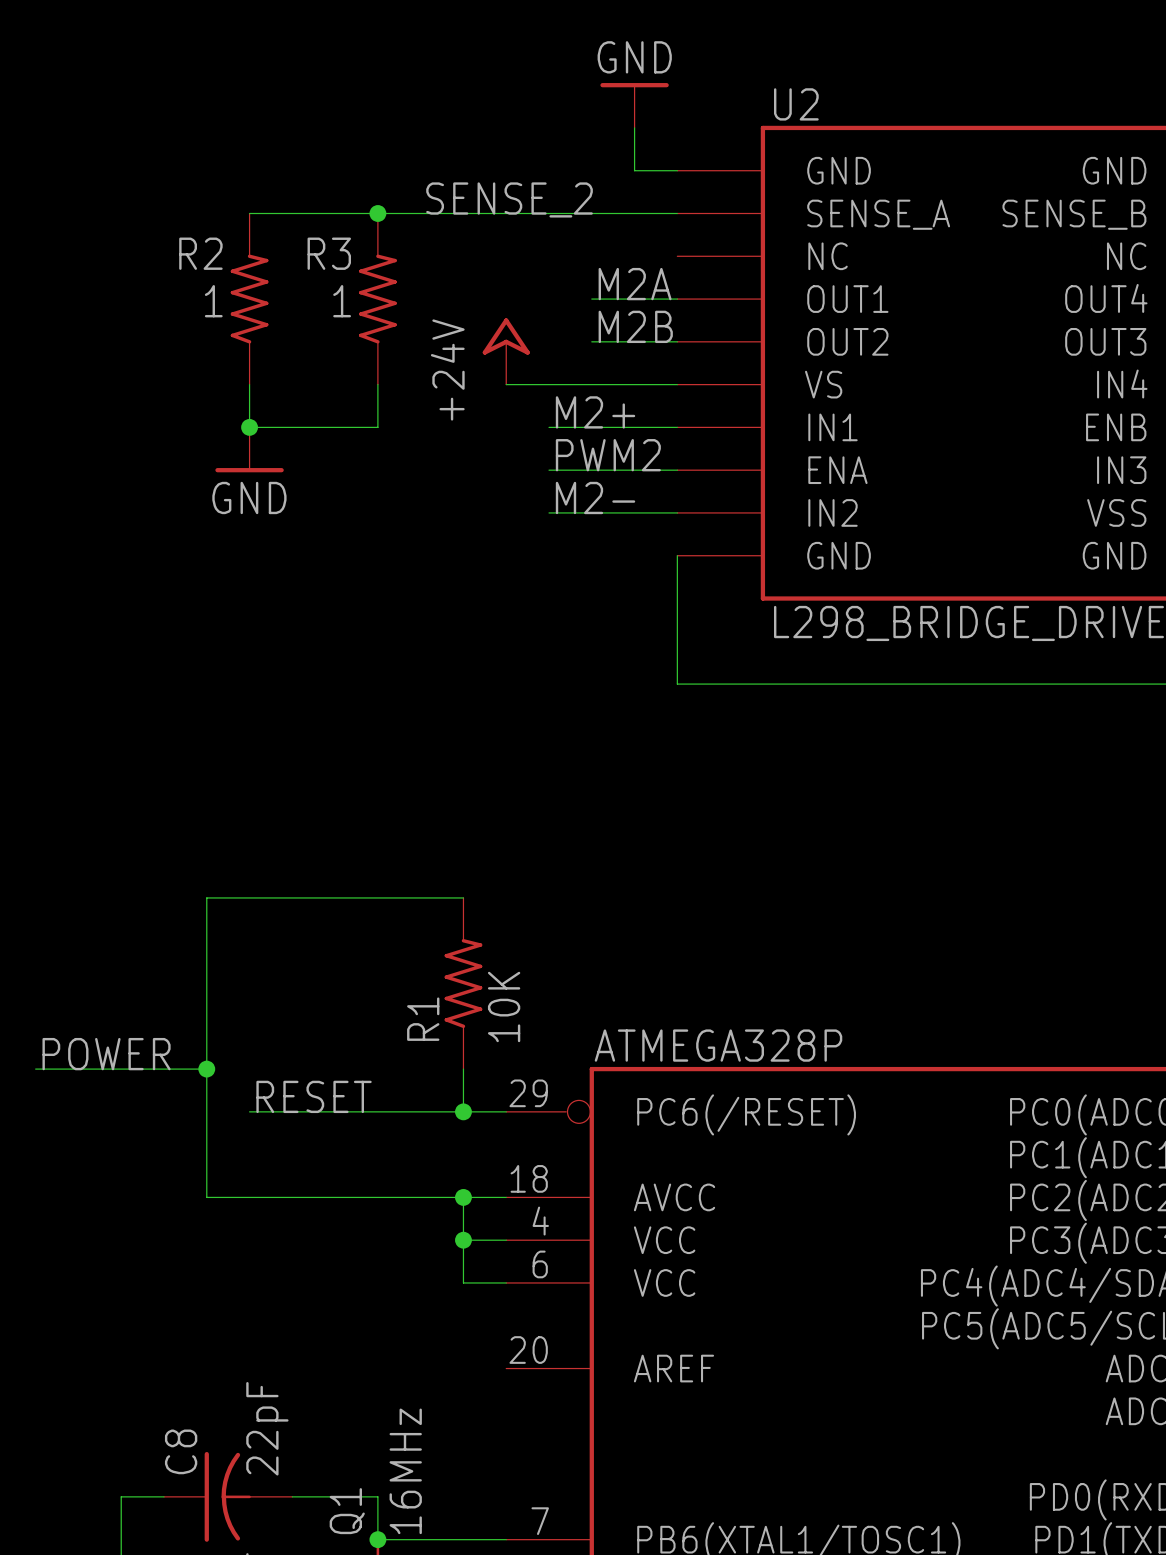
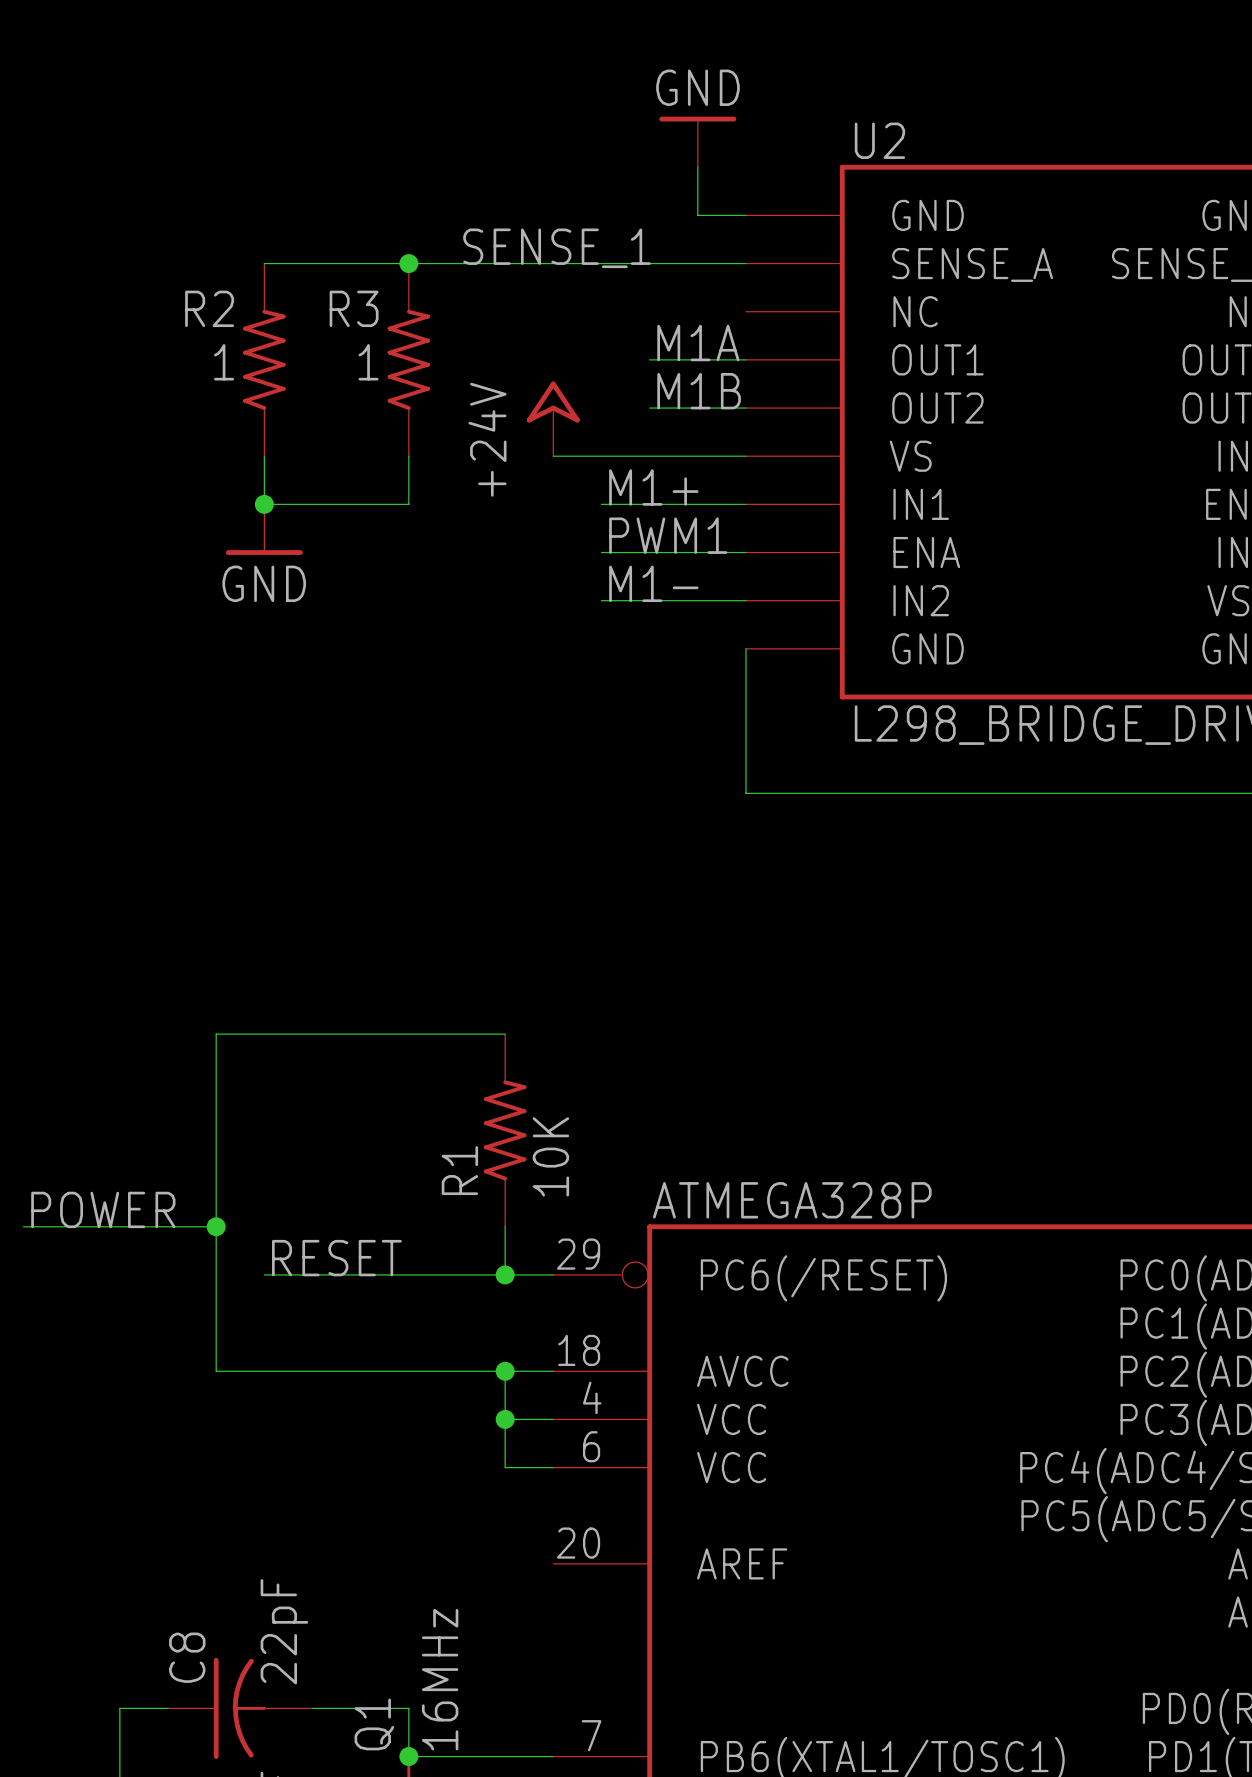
label: SENSE_2 (509, 199) -> SENSE_1 (557, 248)
label: M2A (635, 284) -> M1A (698, 343)
label: M2B (635, 326) -> M1B (699, 391)
label: M2+ (595, 412) -> M1+ (653, 487)
label: PWM2 (608, 455) -> PWM1 (668, 535)
label: M2- (595, 497) -> M1- (653, 583)

